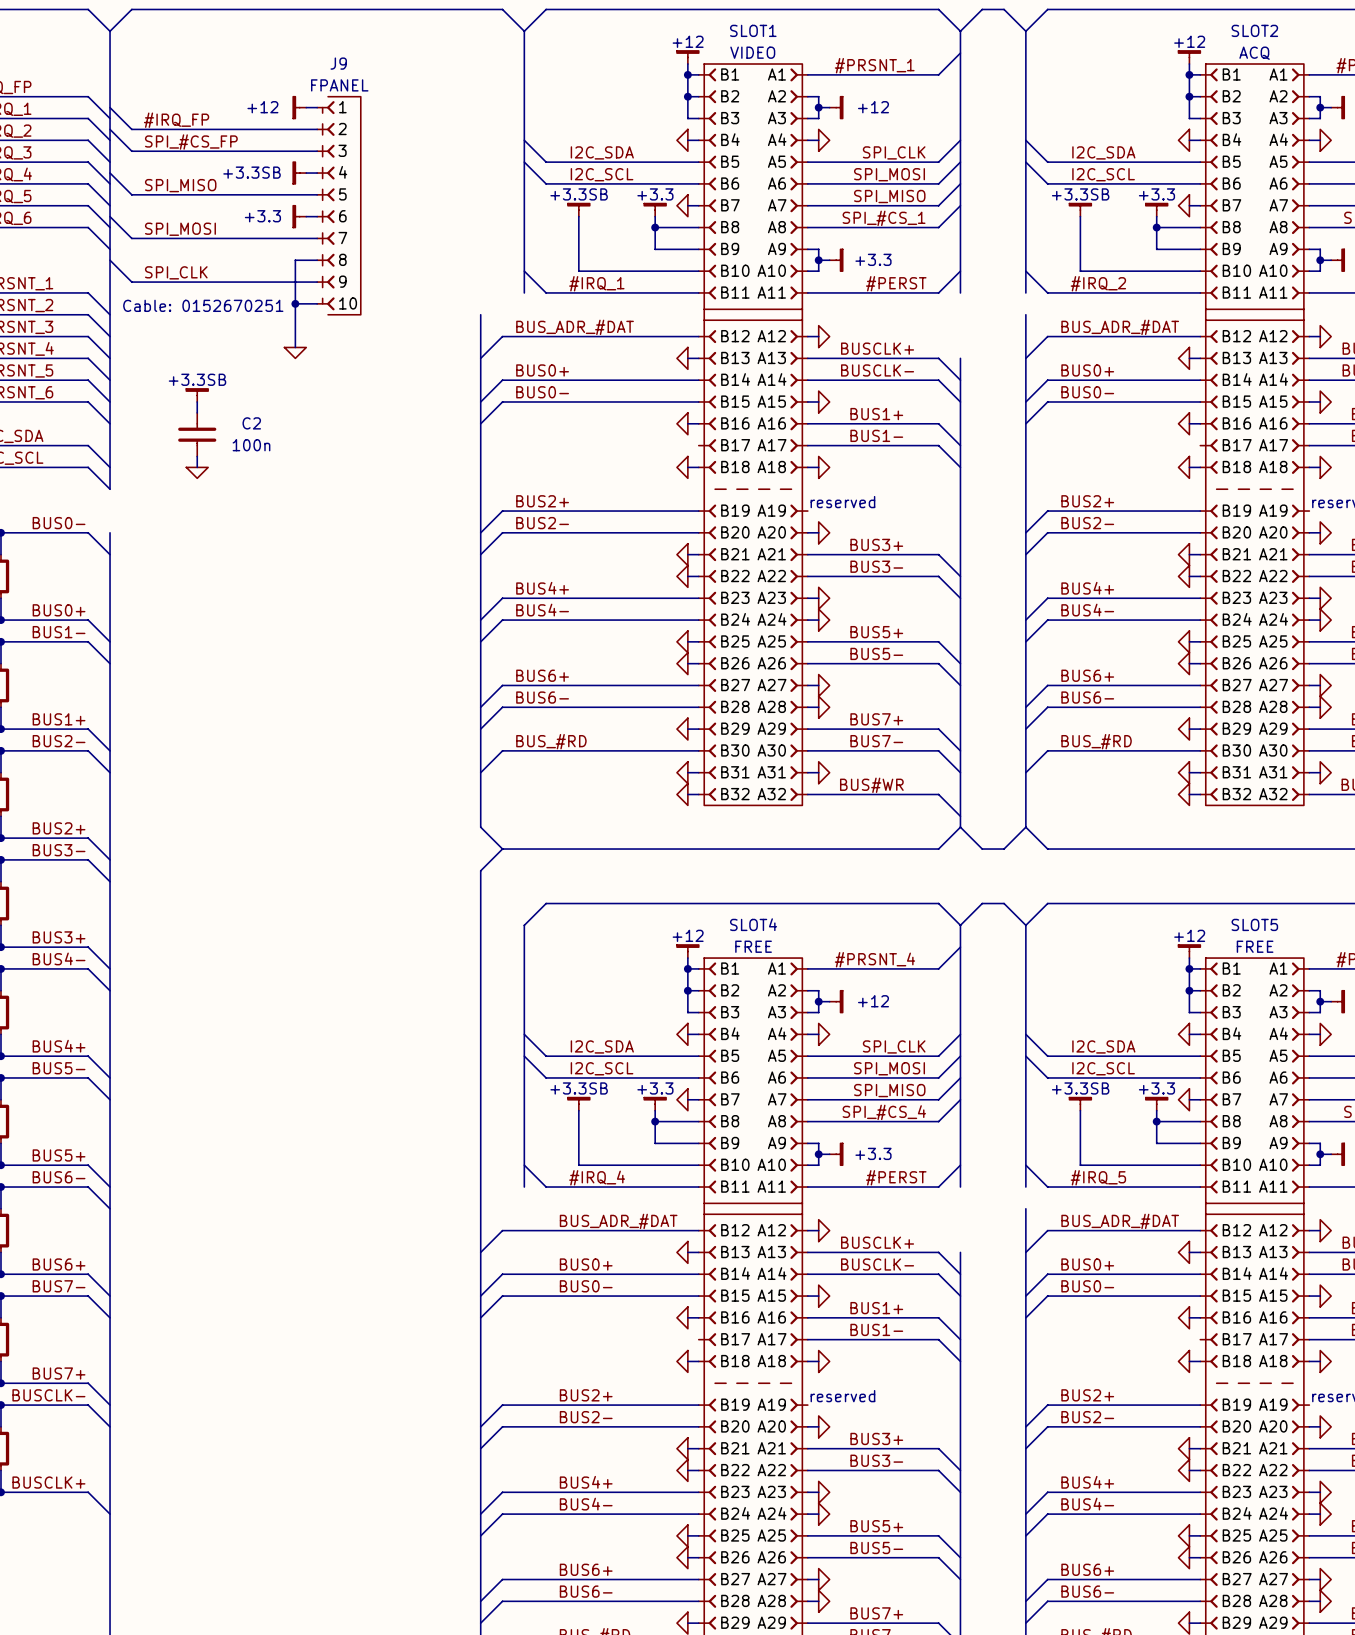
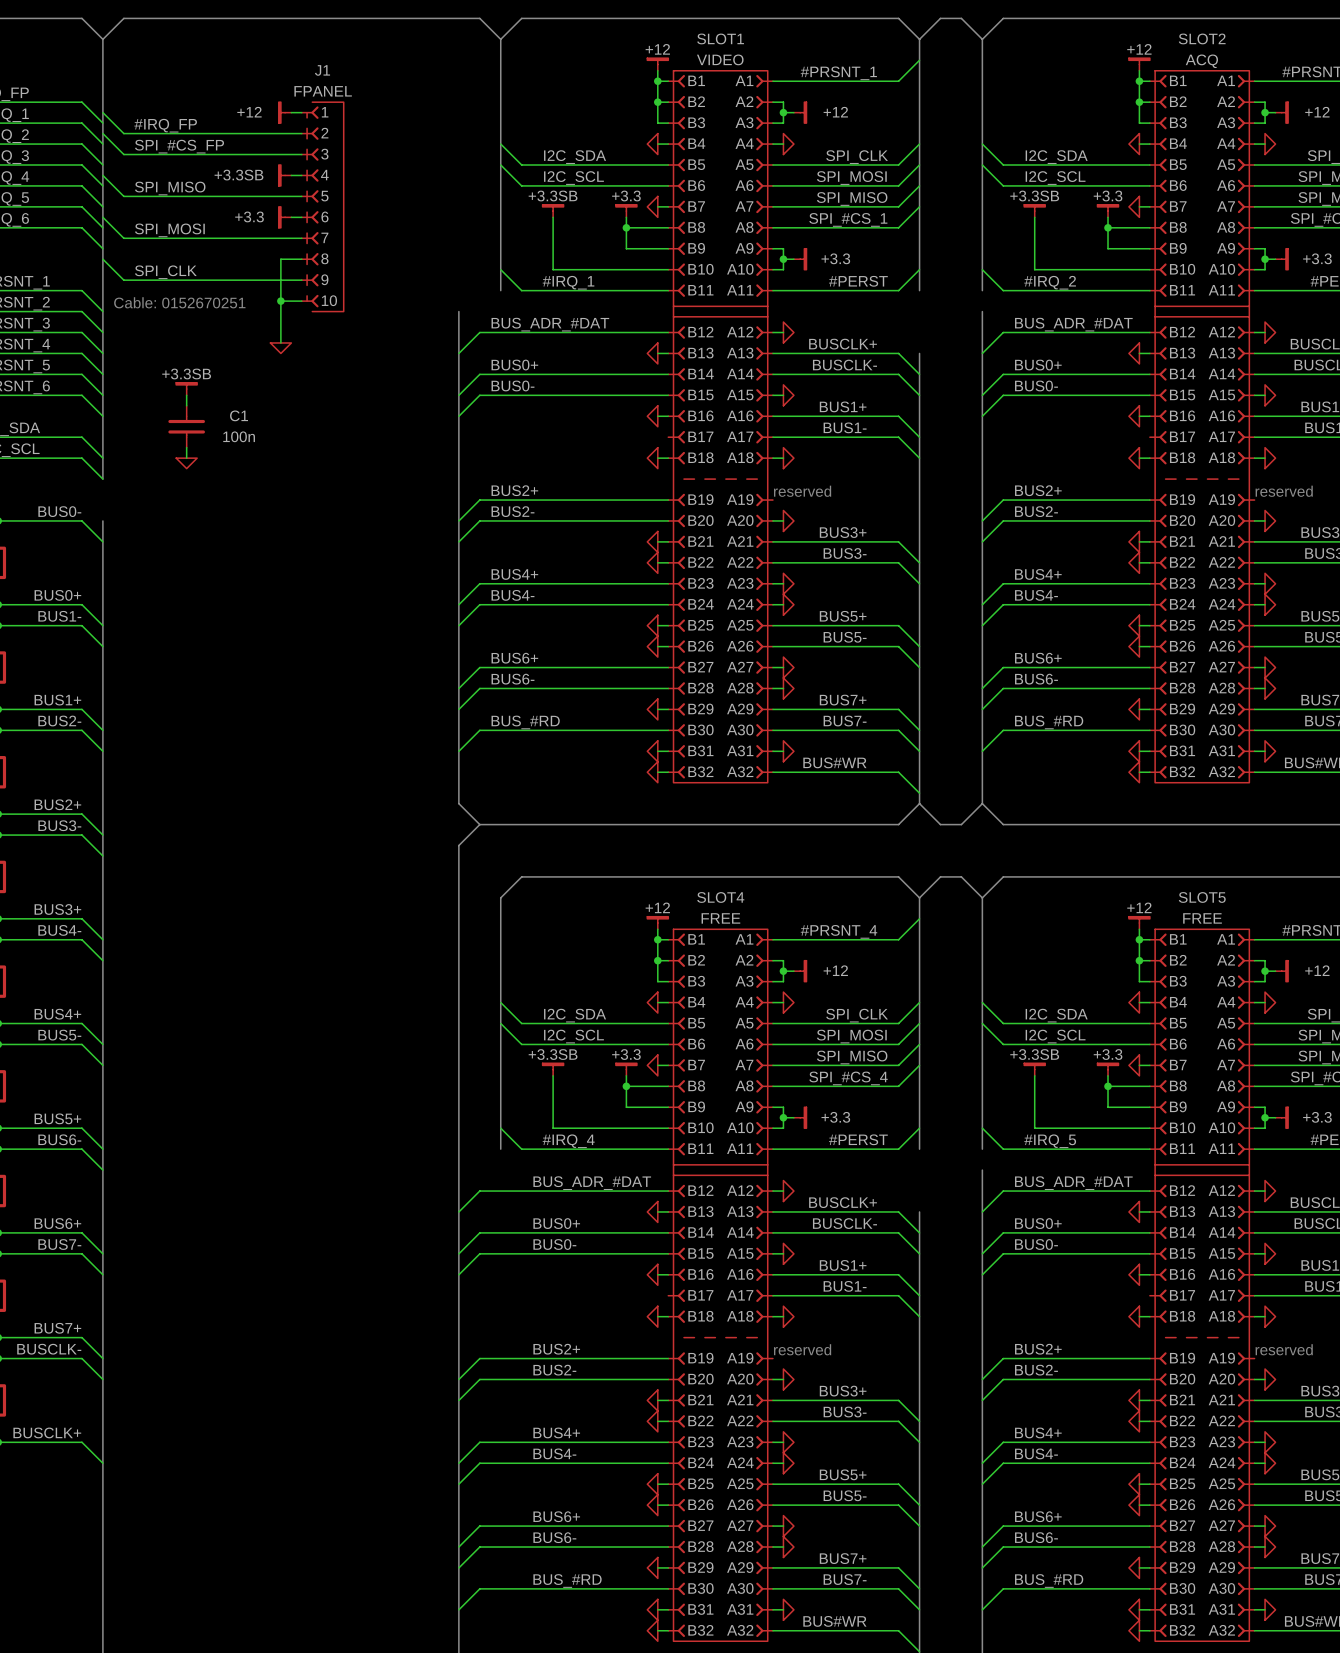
J9 name: J9 (338, 63) -> J1 (322, 70)
C2 name: C2 (251, 423) -> C1 (239, 415)

